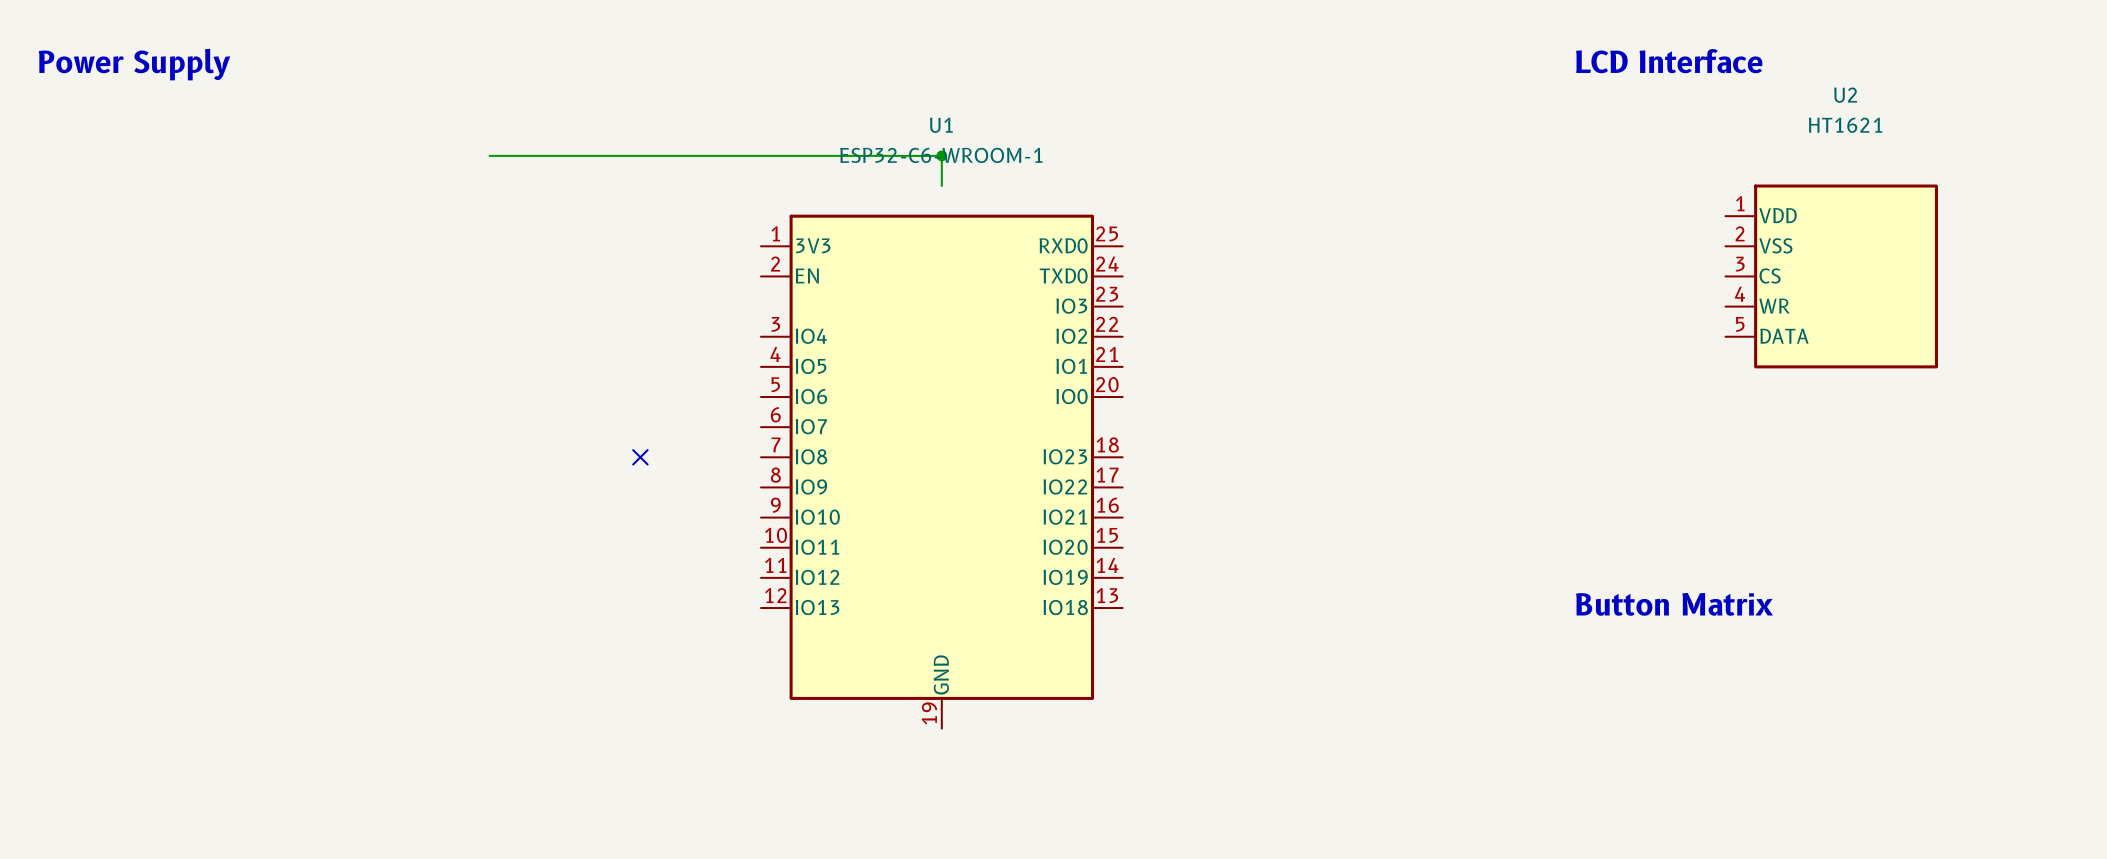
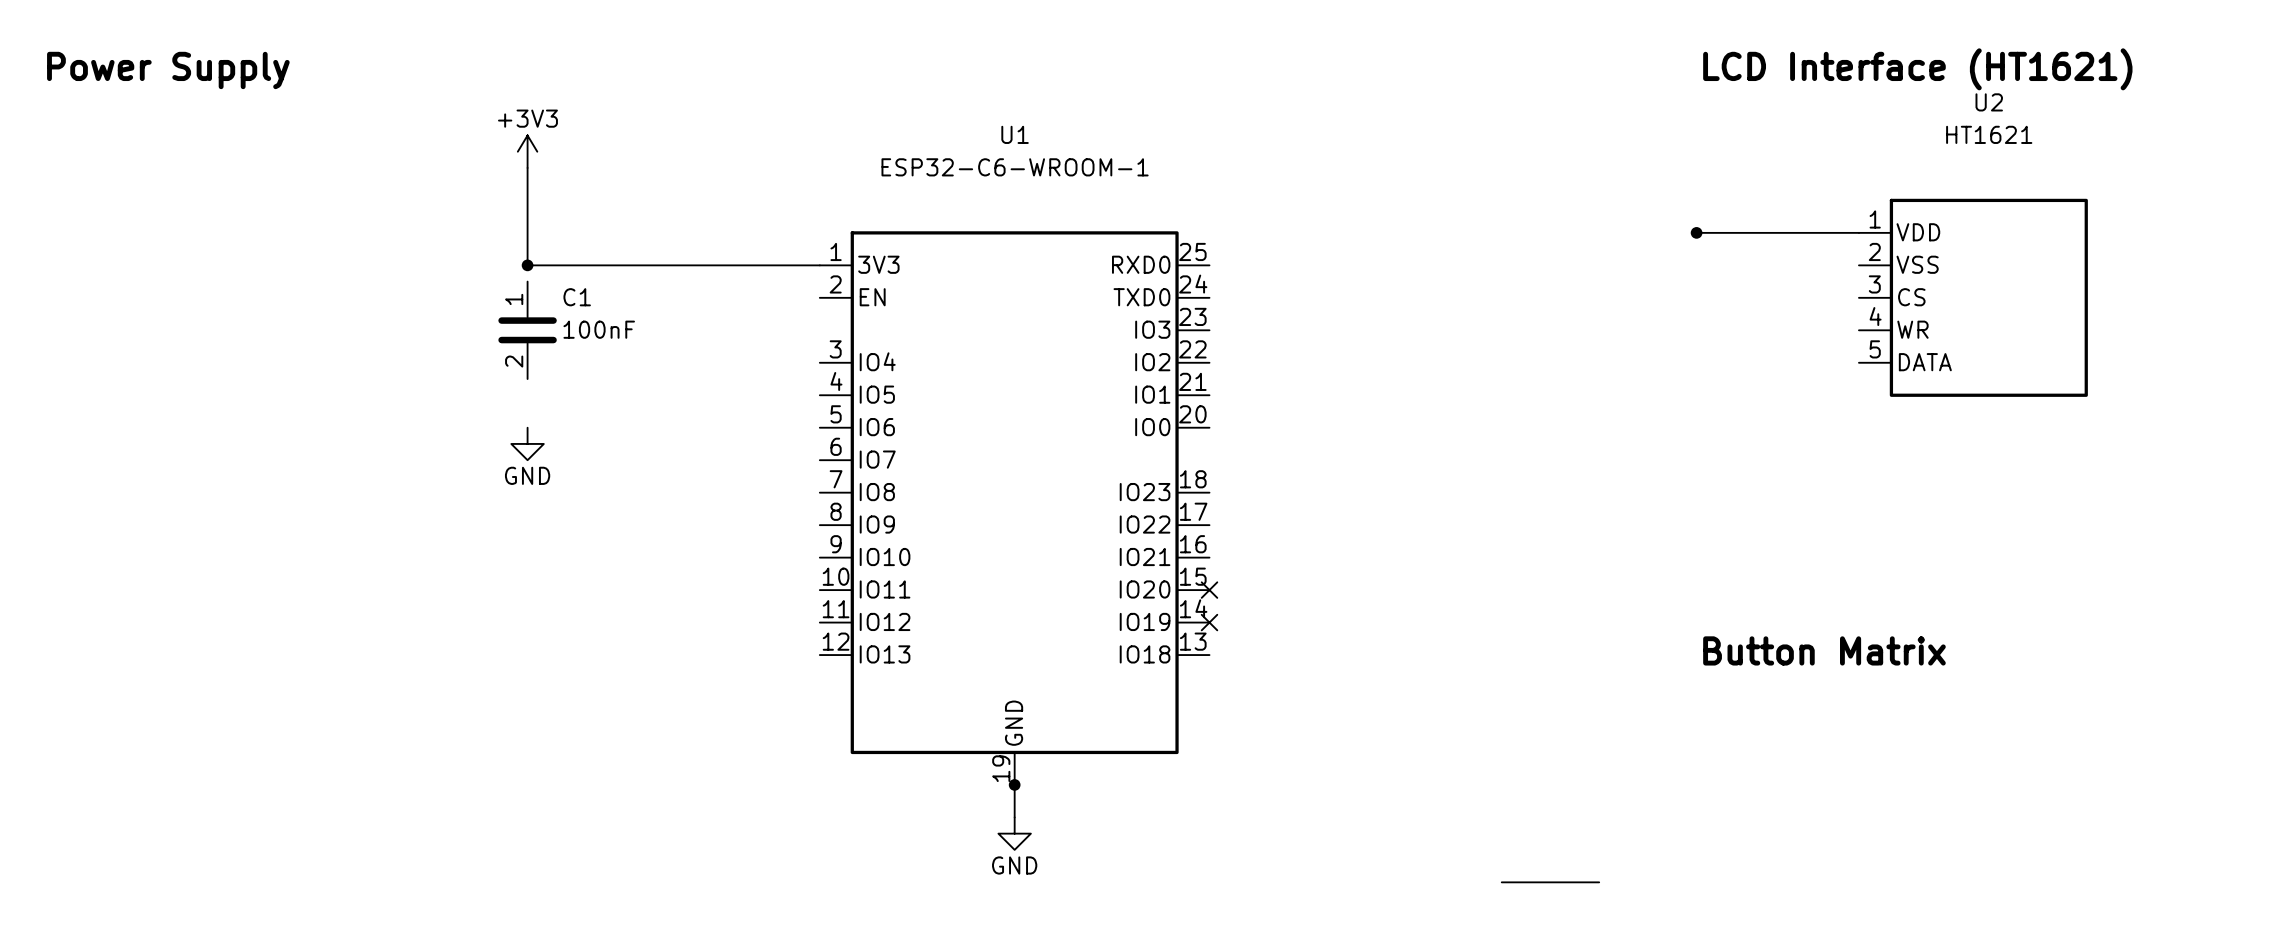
text: LCD Interface (1669, 61) -> LCD Interface (HT1621) (1917, 69)
power symbol: none -> +3V3 (527, 151)
wire: (489, 155) (941, 155) (941, 186) -> (527, 167) (527, 265) (819, 265)
junction: (941, 155) -> none
wire: none -> (1696, 232) (1858, 232)
junction: none -> (1696, 232)
junction: none -> (527, 265)
C1: none -> 100nF (527, 330)
power symbol: none -> GND (527, 443)
no-connect mark: (640, 457) -> none
no-connect mark: none -> (1209, 590)
no-connect mark: none -> (1209, 622)
wire: none -> (1014, 784) (1014, 817)
junction: none -> (1014, 784)
power symbol: none -> GND (1014, 833)
wire: none -> (1501, 882) (1599, 882)

